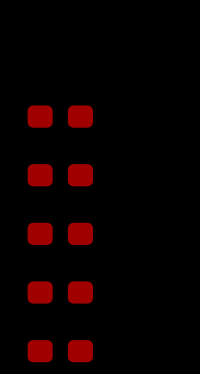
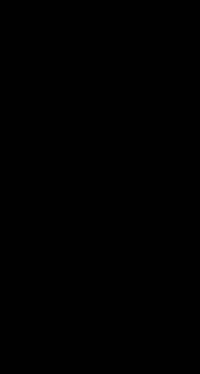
part: (60, 116) -> none
part: (60, 175) -> none
part: (60, 233) -> none
part: (60, 292) -> none
part: (60, 351) -> none

